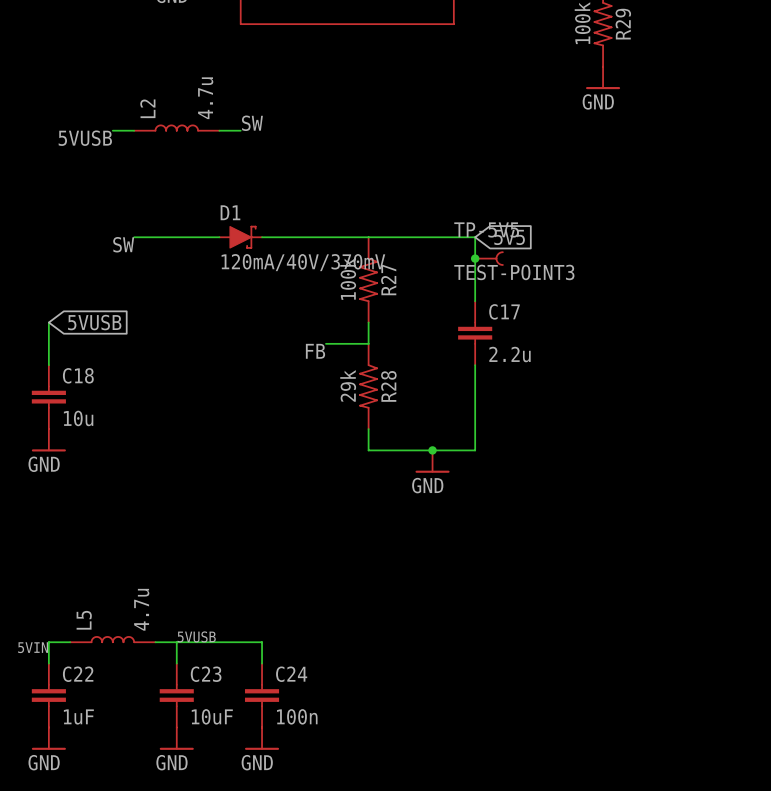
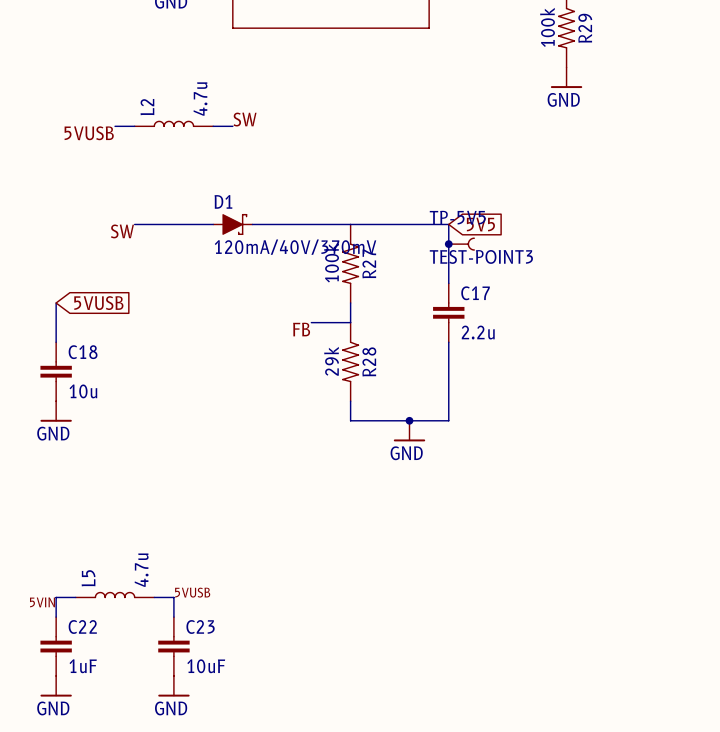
wire: (176, 642) (262, 642) (262, 663) -> none
C24: 100n (262, 695) -> none
power symbol: GND (262, 738) -> none

